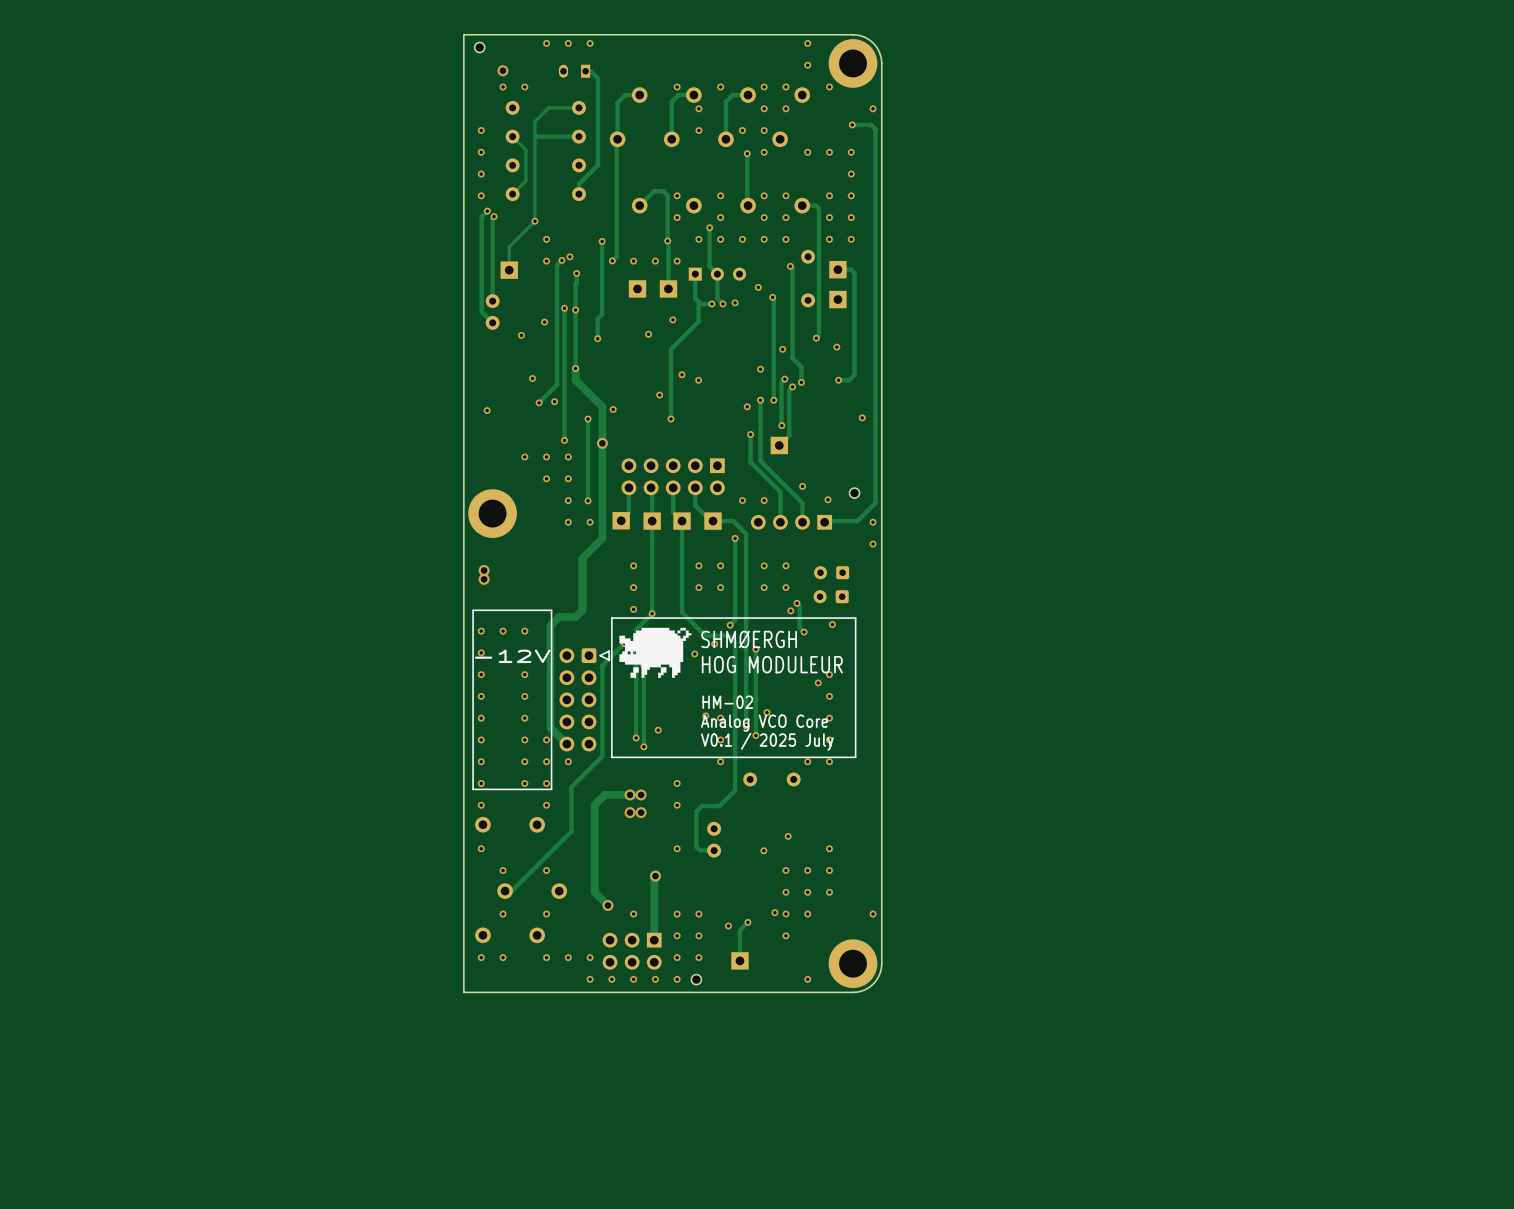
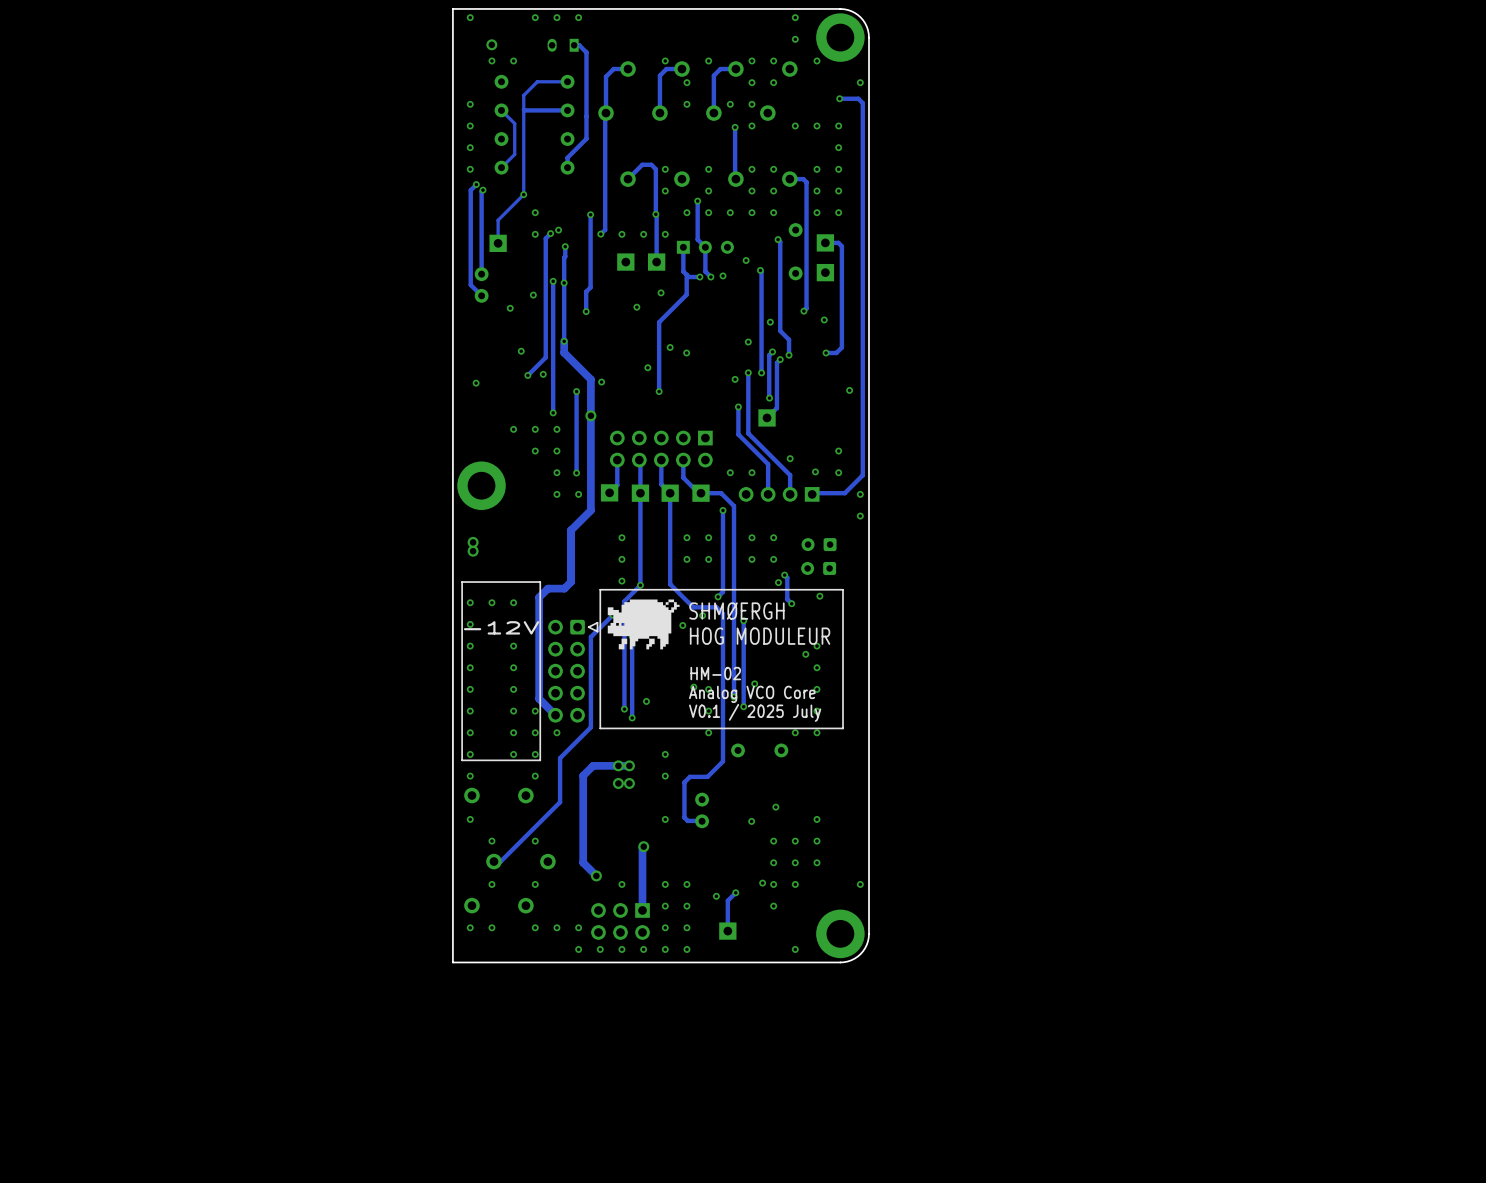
via: none -> (470, 17)
part: (479, 47) -> none
via: none -> (838, 451)
part: (854, 493) -> none
via: none -> (838, 472)
part: (696, 979) -> none
via: none -> (686, 949)

